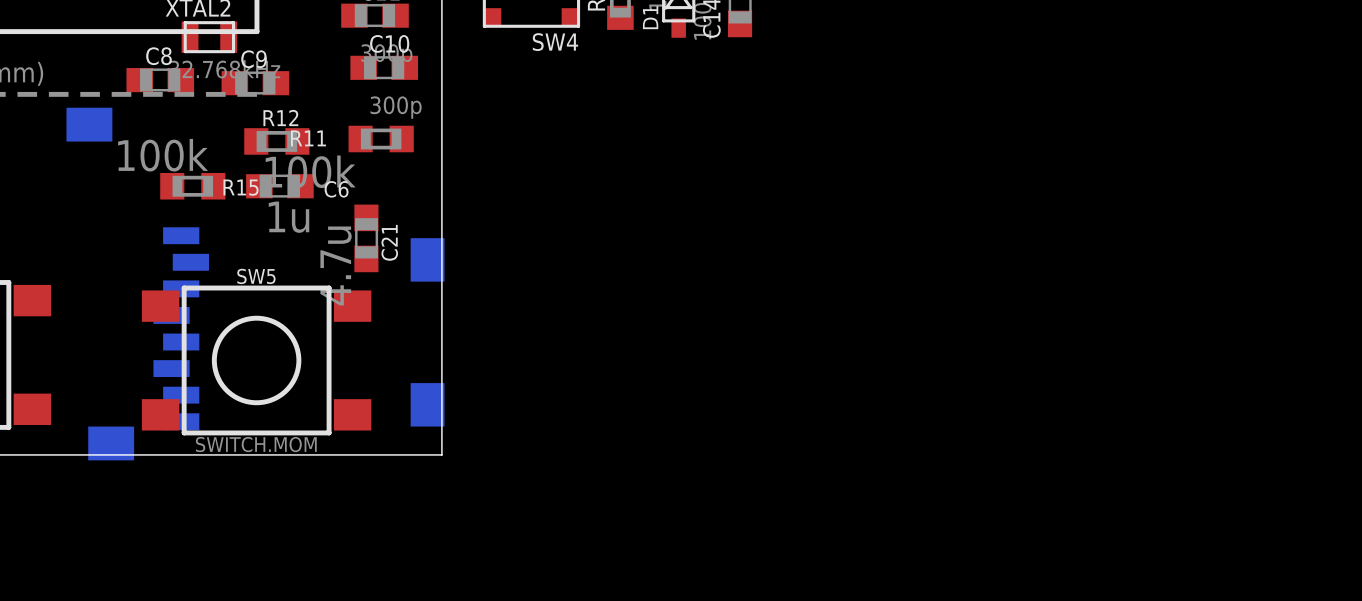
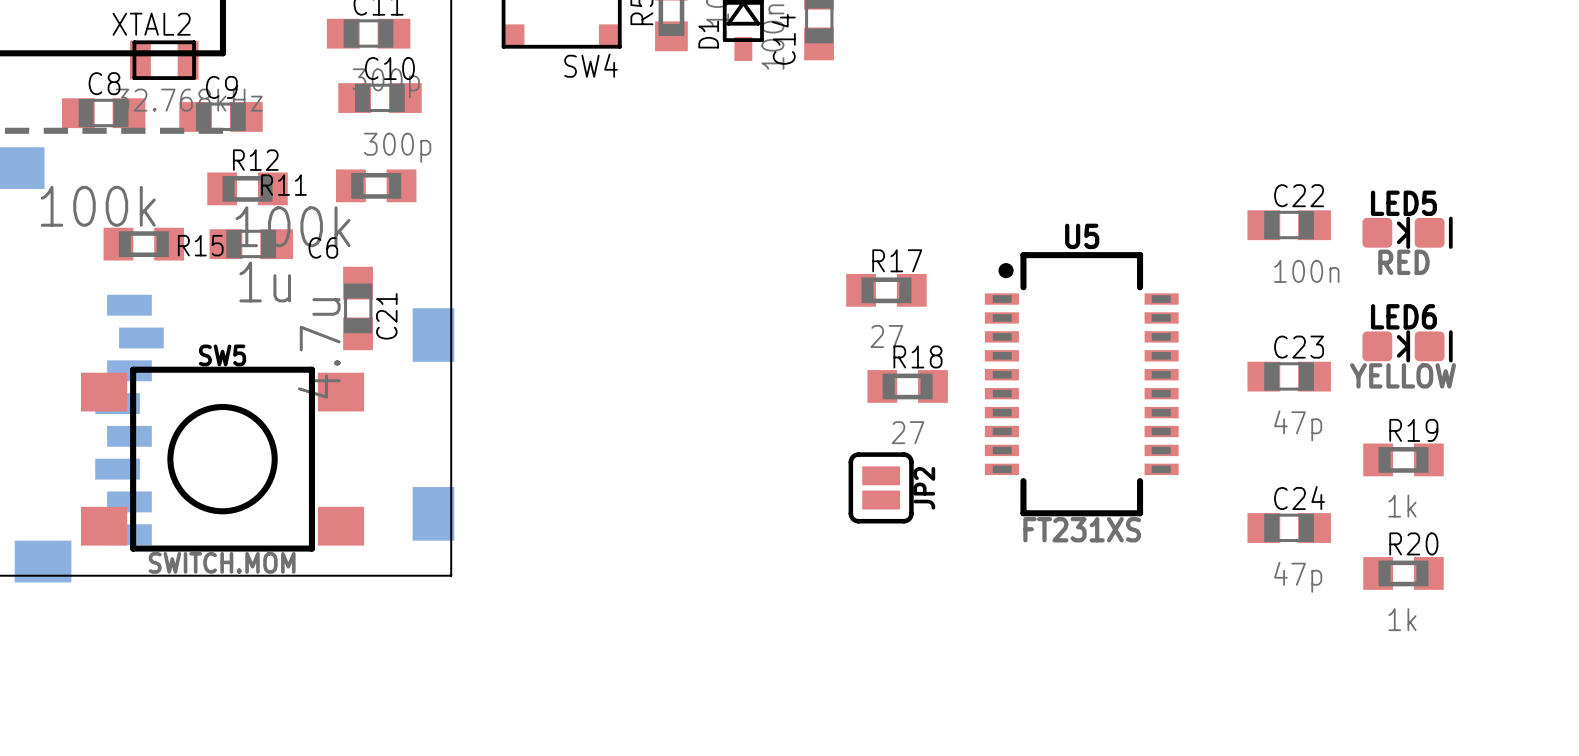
C22: none -> 100n (1289, 225)
LED5: none -> RED (1407, 232)
R17: none -> 27 (886, 290)
LED6: none -> YELLOW (1407, 346)
C23: none -> 47p (1289, 376)
U5: none -> FT231XS (1081, 384)
R18: none -> 27 (907, 386)
R19: none -> 1k (1403, 459)
JP2: none -> (881, 487)
C24: none -> 47p (1289, 528)
R20: none -> 1k (1403, 573)

